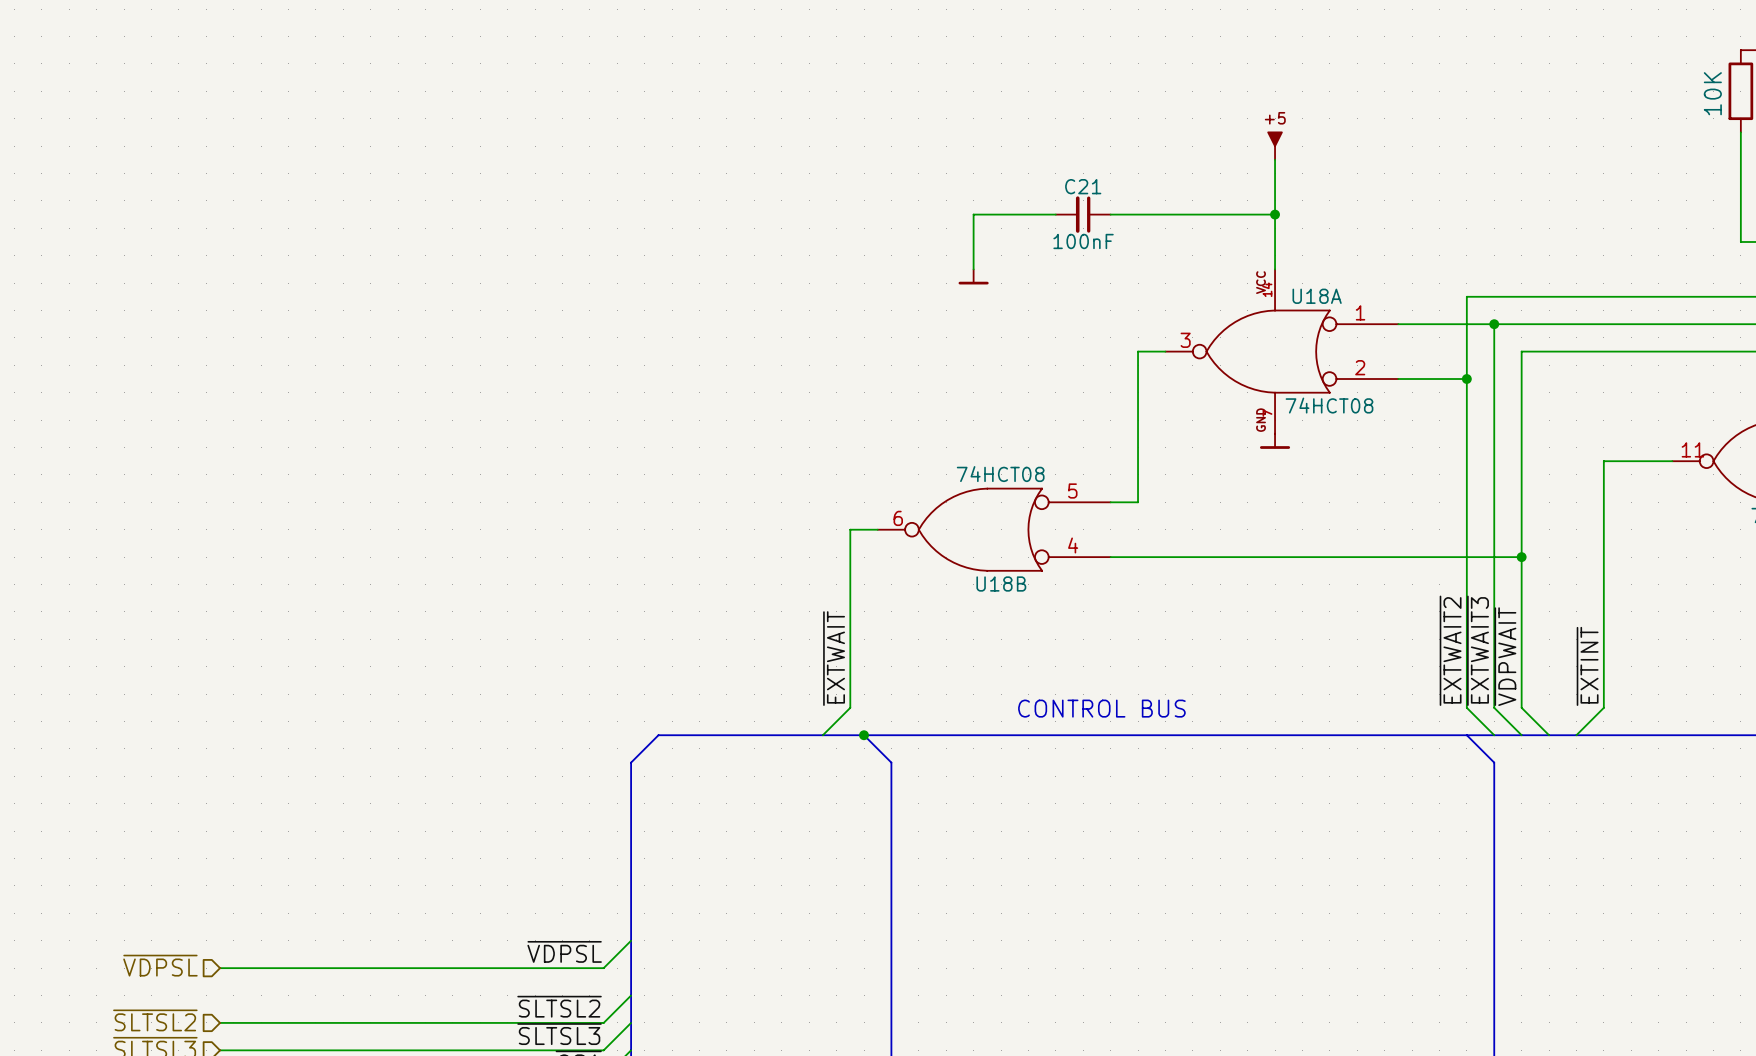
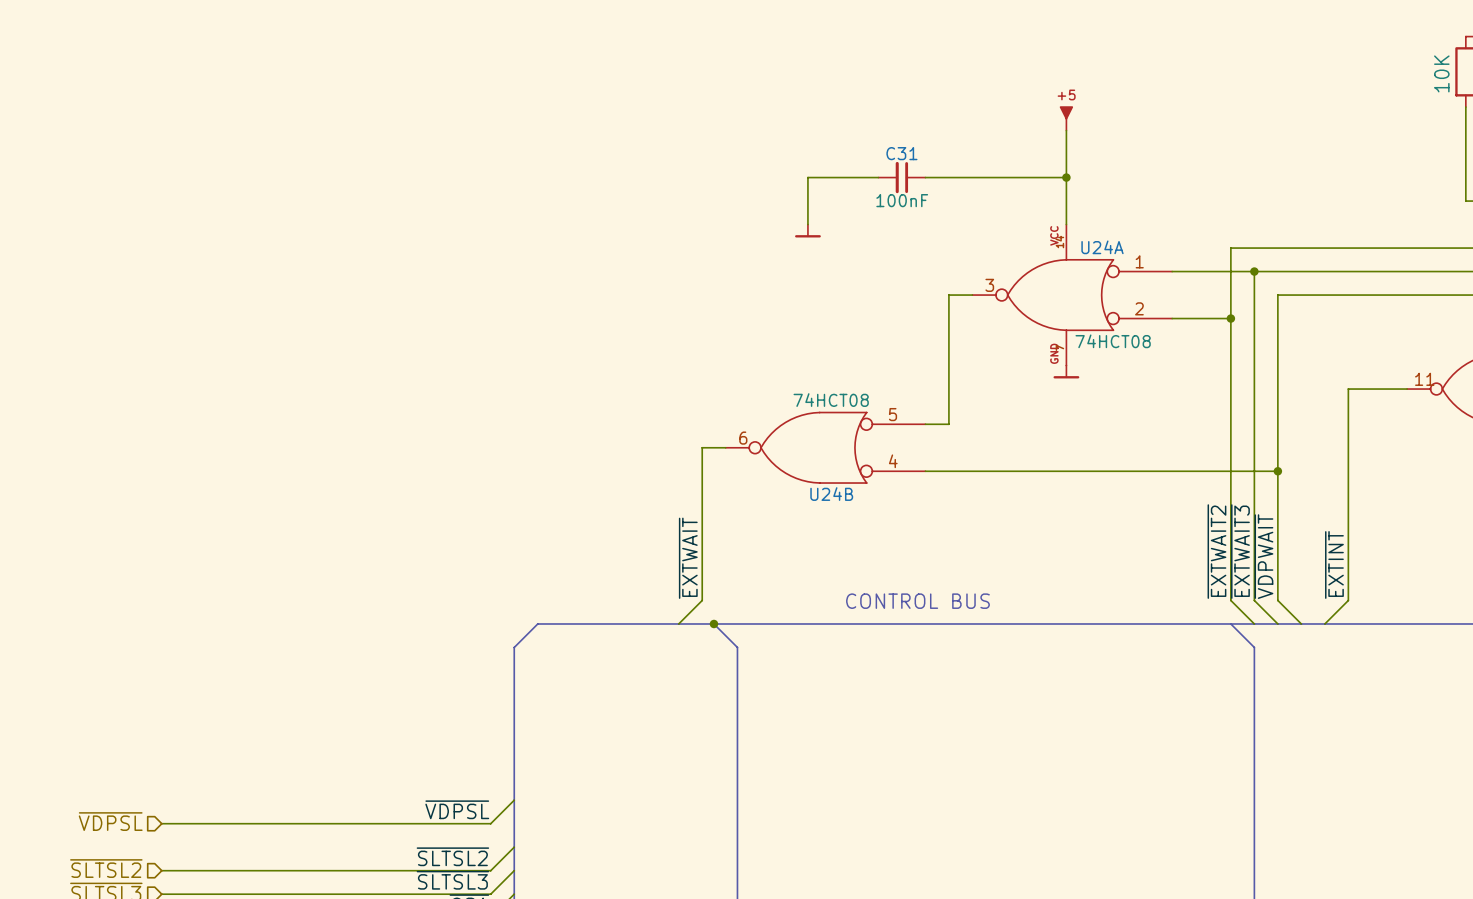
C21 name: C21 (1083, 186) -> C31 (901, 153)
U18A name: U18A (1317, 296) -> U24A (1102, 247)
U18B name: U18B (1001, 584) -> U24B (831, 494)

